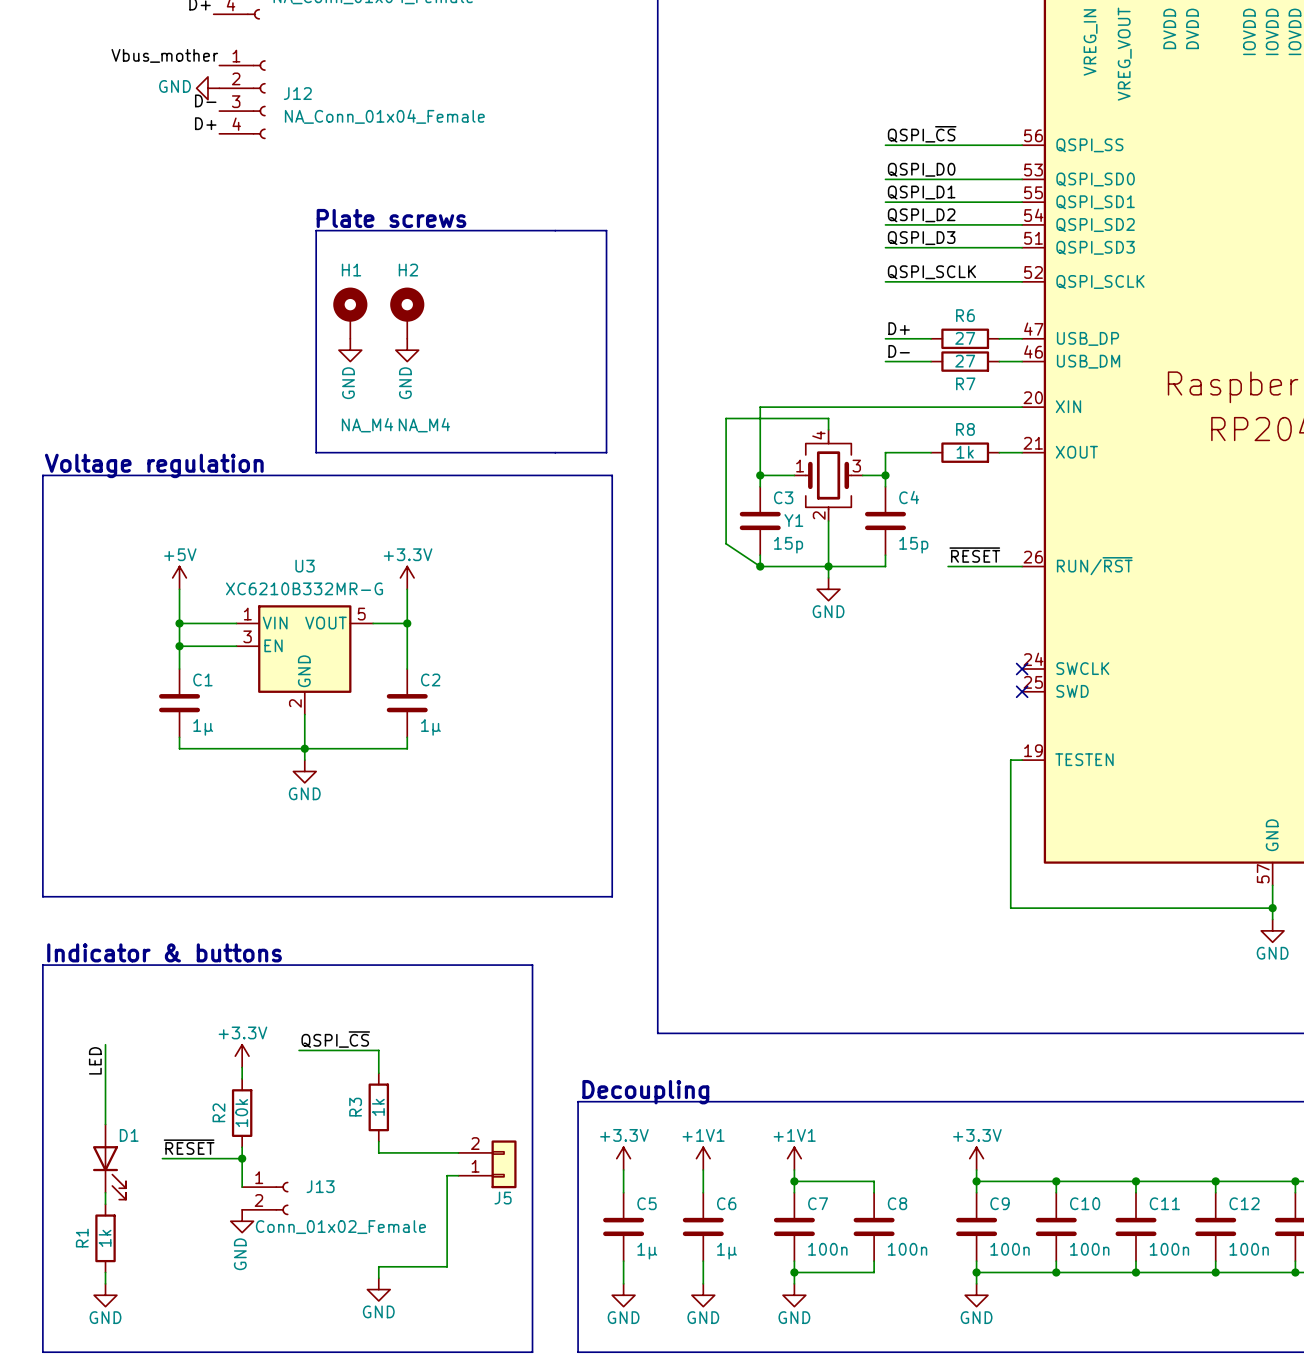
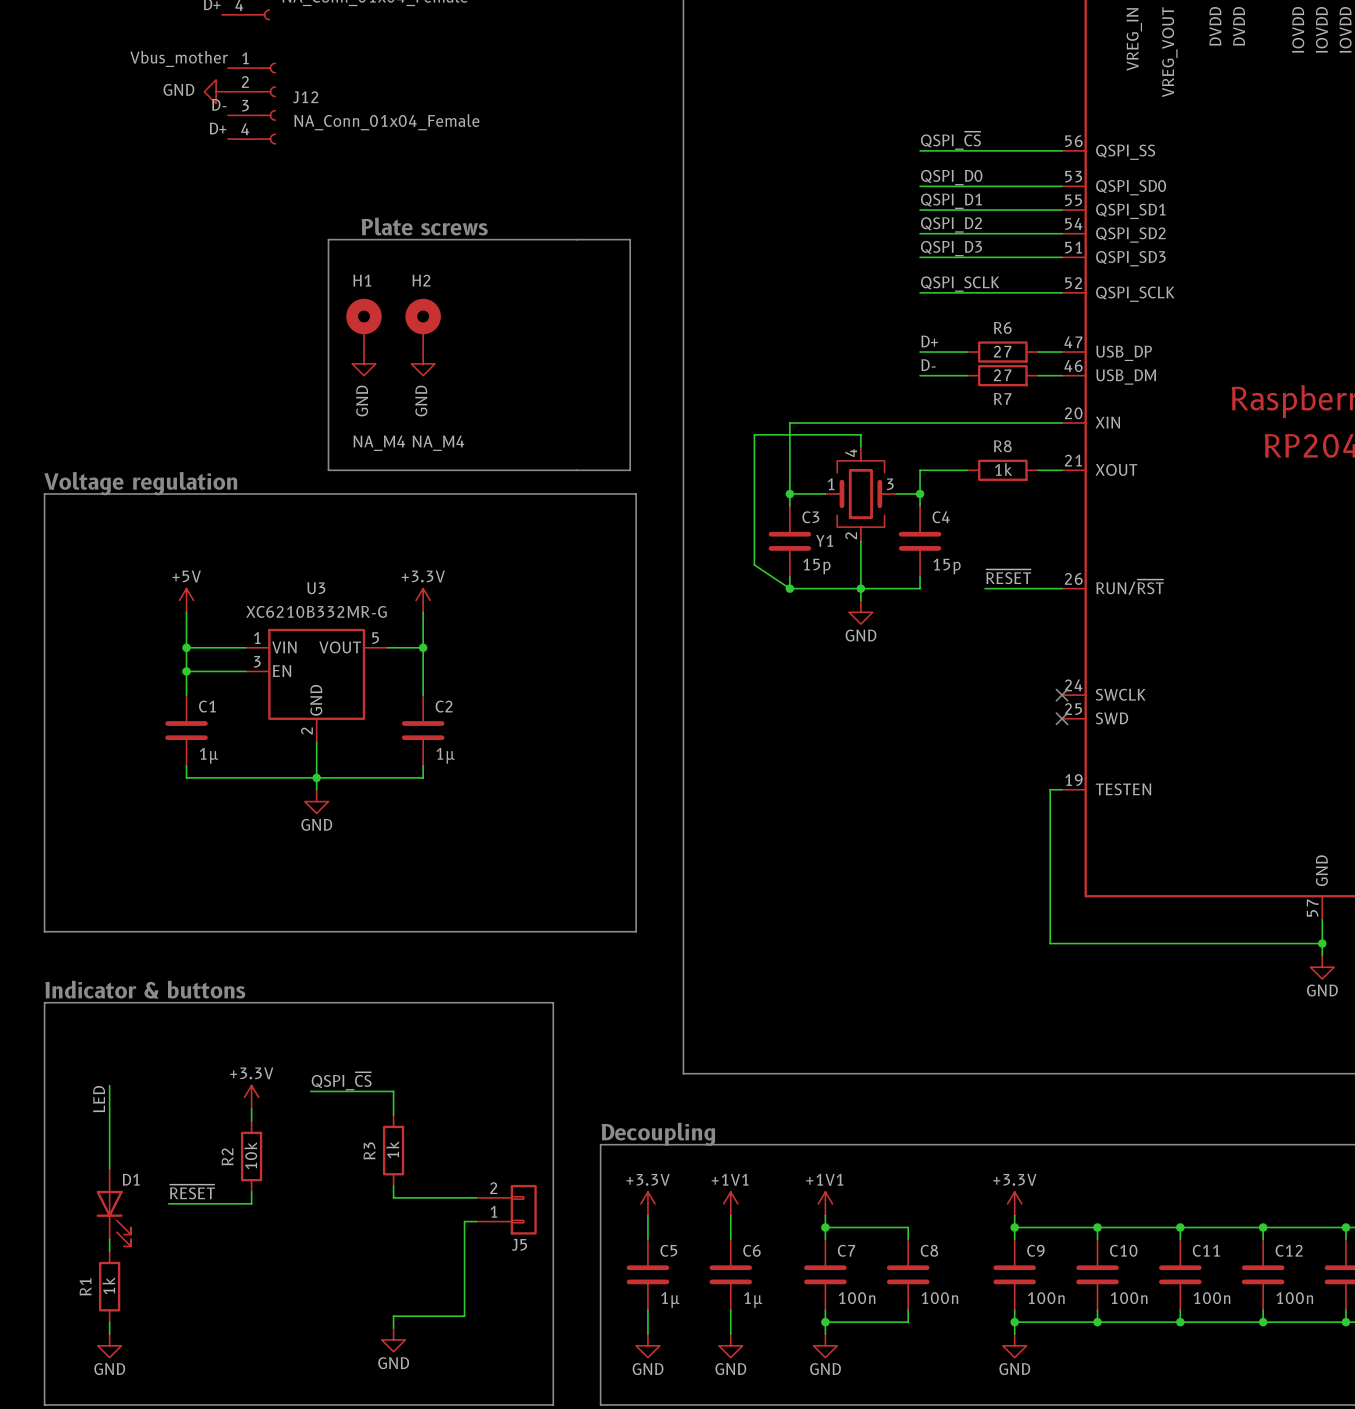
wire: (242, 1158) (242, 1187) -> none
junction: (242, 1158) -> none
J13: Conn_01x02_Female (265, 1198) -> none
power symbol: GND (242, 1221) -> none

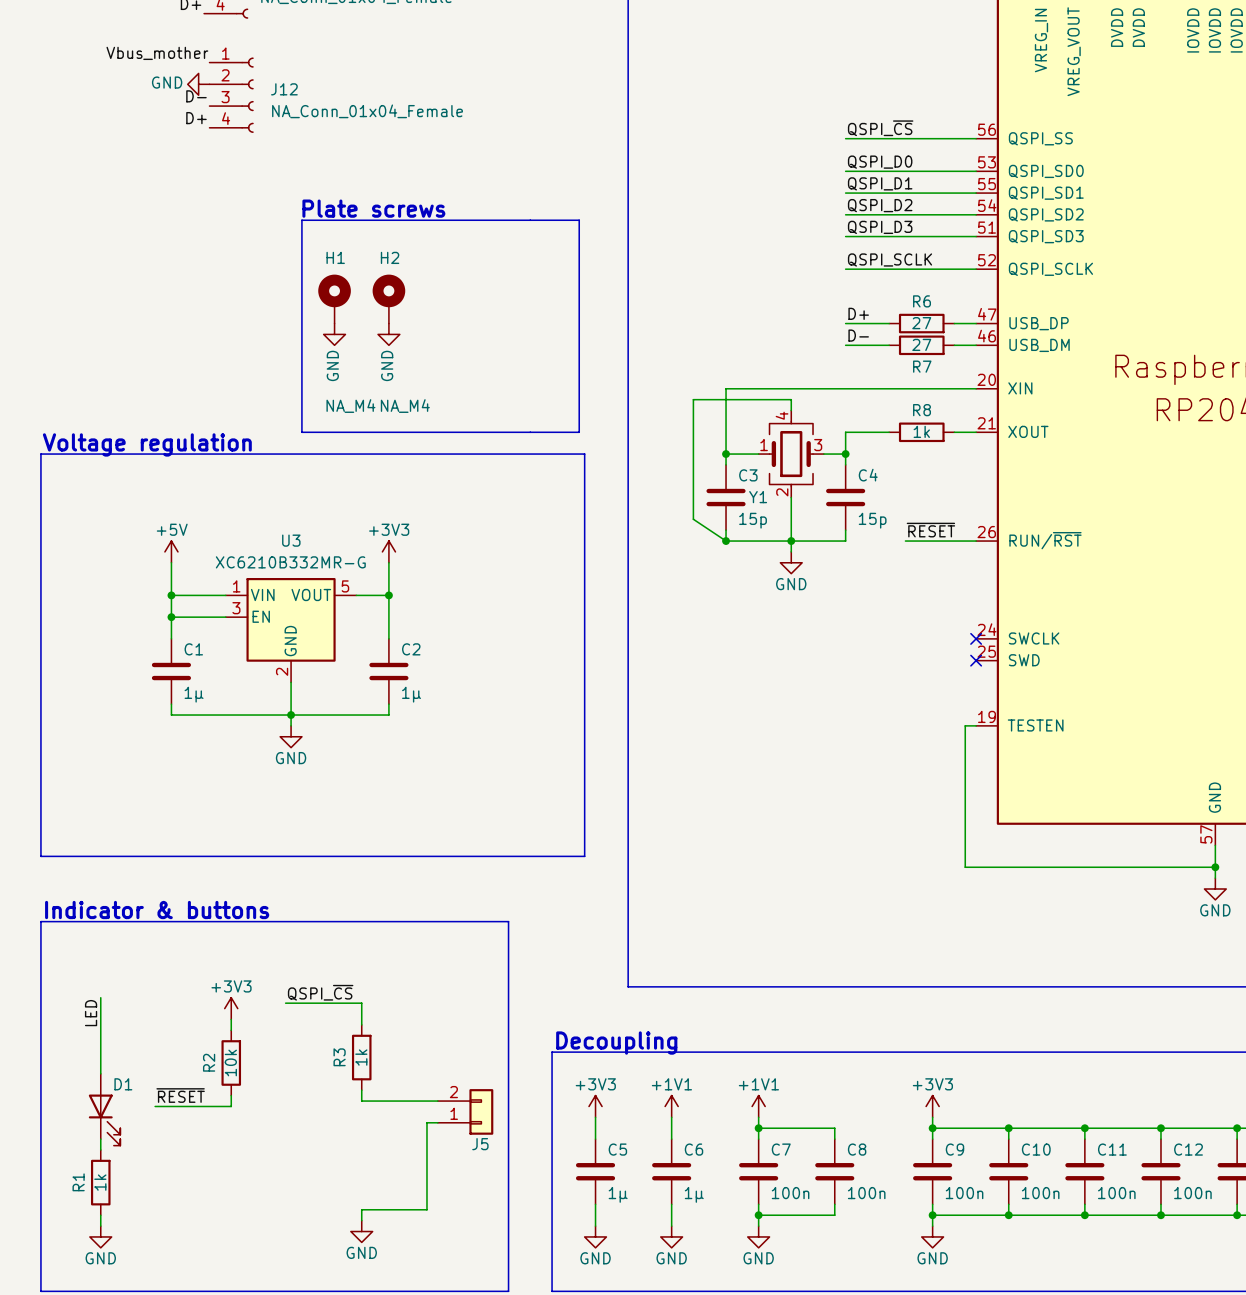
power symbol: +3.3V (423, 600) -> +3V3 (388, 551)
power symbol: +3.3V (251, 1097) -> +3V3 (231, 1008)
power symbol: +3.3V (647, 1203) -> +3V3 (595, 1106)
power symbol: +3.3V (1014, 1203) -> +3V3 (932, 1106)

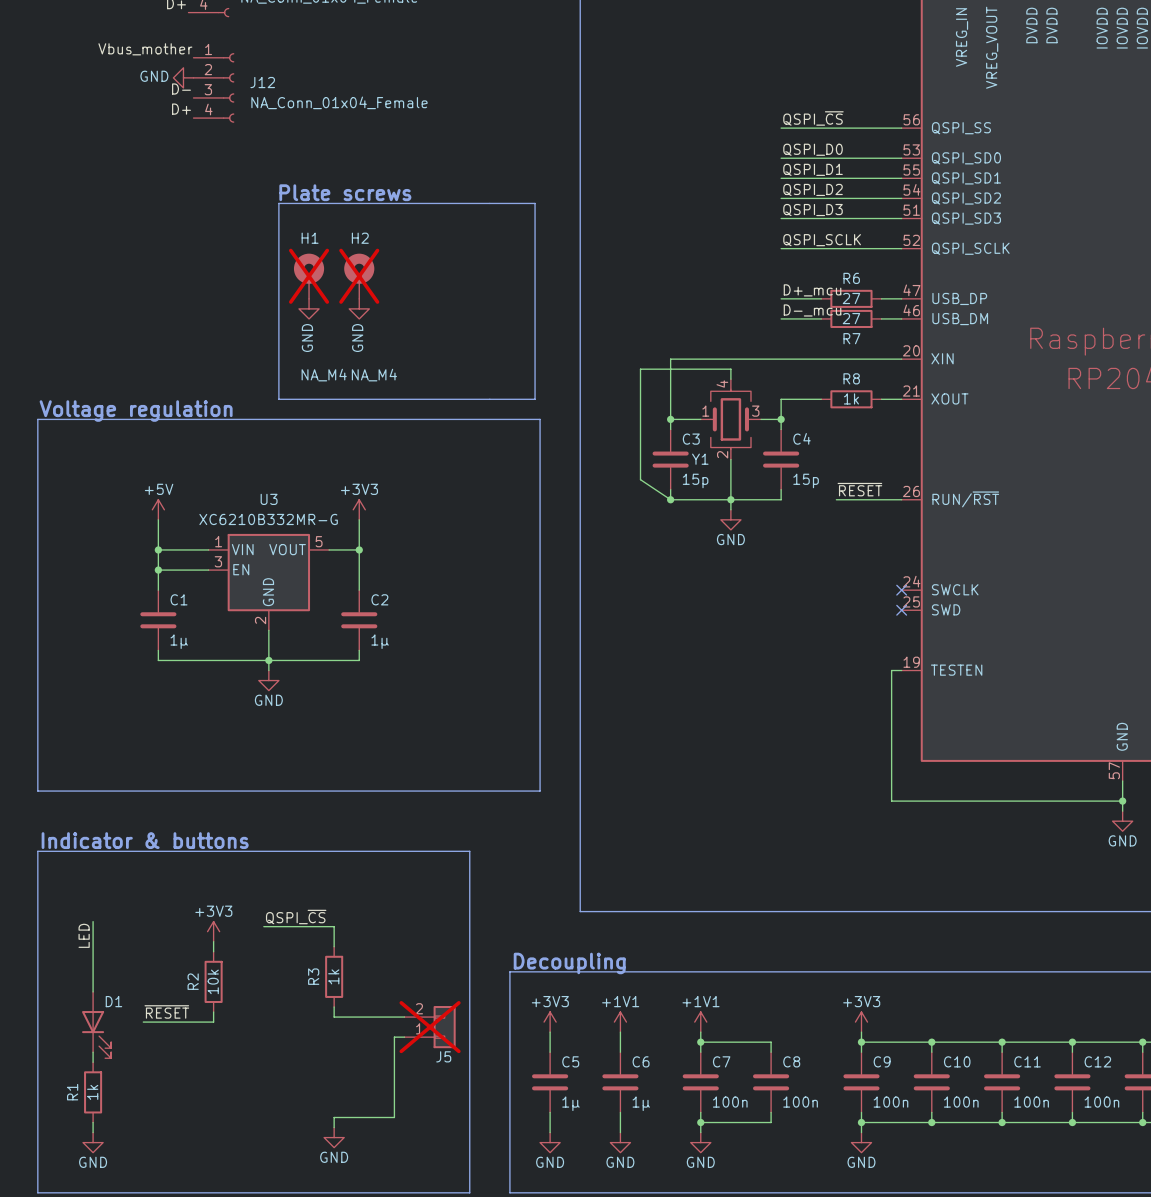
H1 do-not-place cross: none -> (309, 276)
H2 do-not-place cross: none -> (359, 276)
label: D+ (858, 313) -> D+_mcu (812, 290)
label: D- (858, 335) -> D-_mcu (812, 310)
J5 do-not-place cross: none -> (430, 1027)

